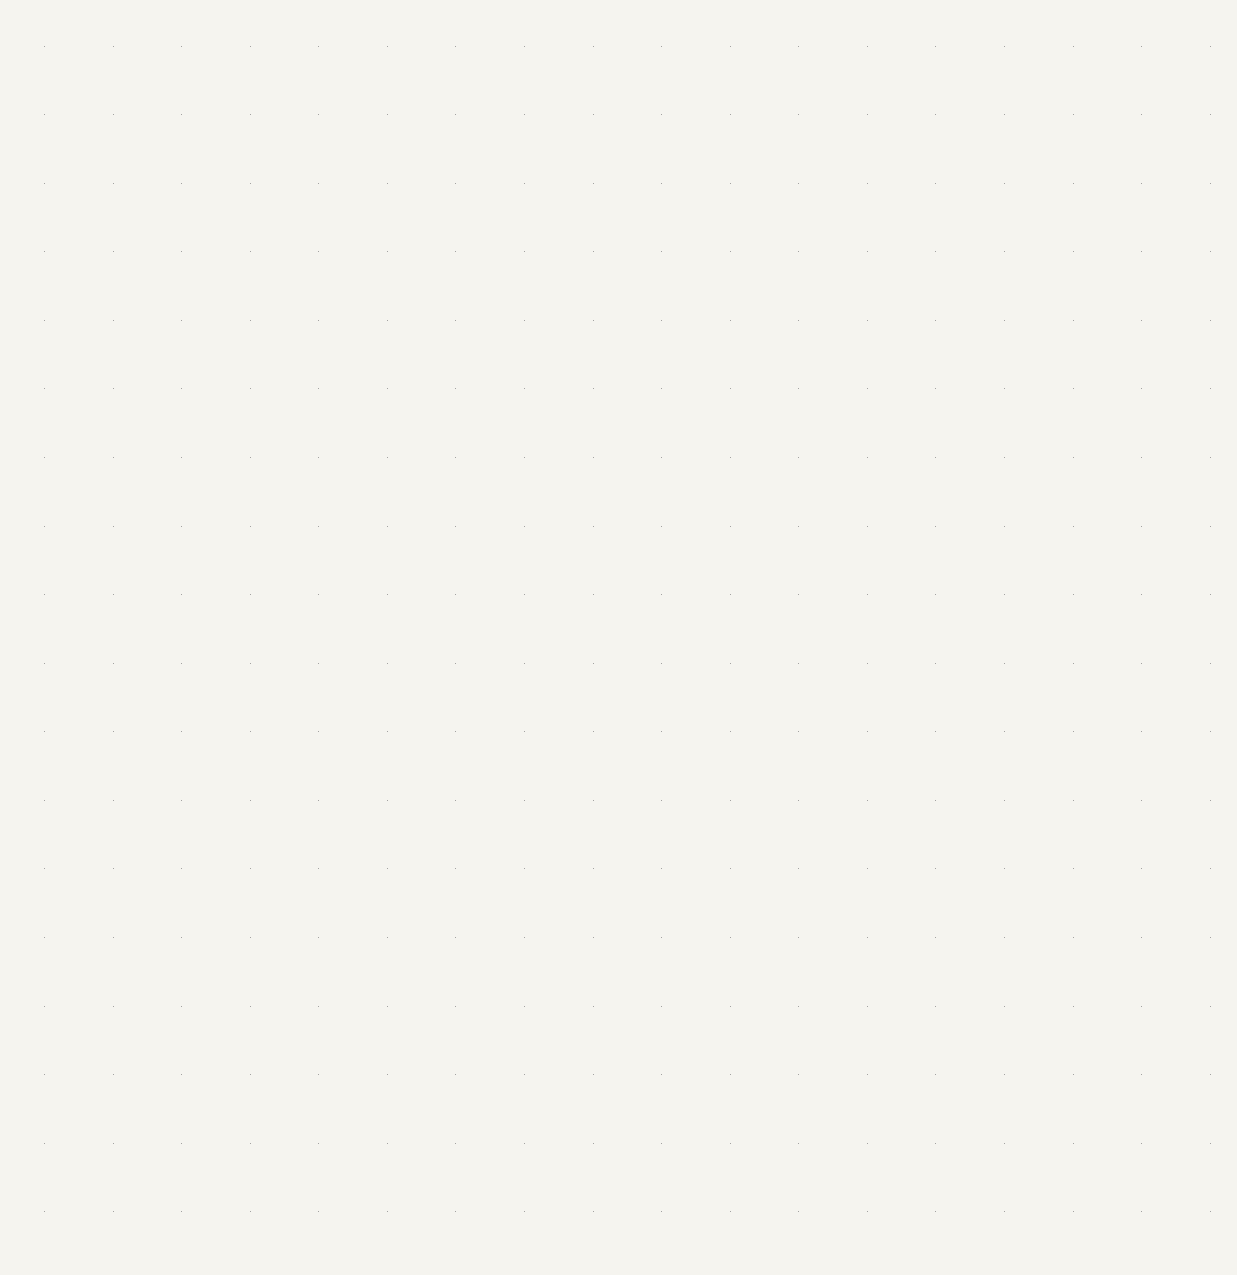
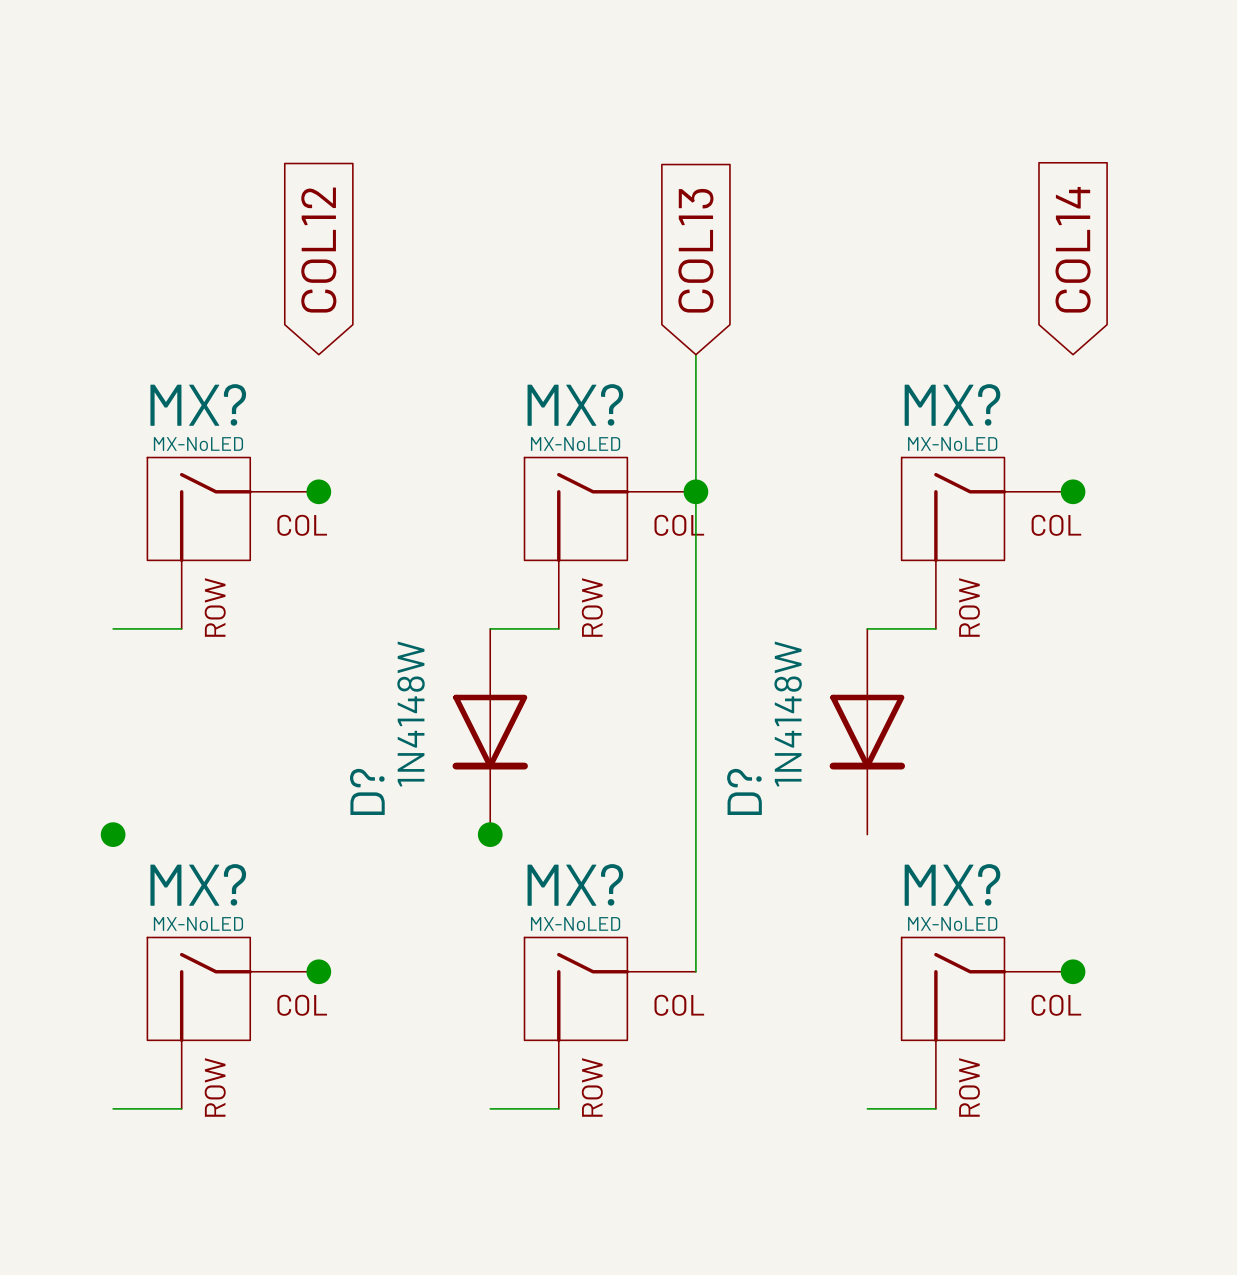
global label: none -> COL14 (1073, 249)
global label: none -> COL12 (318, 250)
global label: none -> COL13 (695, 250)
wire: none -> (695, 354) (695, 971)
junction: none -> (318, 491)
junction: none -> (695, 491)
junction: none -> (1073, 491)
MX?: none -> MX-NoLED (233, 543)
MX?: none -> MX-NoLED (610, 543)
MX?: none -> MX-NoLED (987, 543)
wire: none -> (113, 628) (181, 628)
wire: none -> (490, 628) (558, 628)
wire: none -> (867, 628) (935, 628)
D?: none -> 1N4148W (490, 731)
D?: none -> 1N4148W (867, 731)
junction: none -> (113, 834)
junction: none -> (490, 834)
junction: none -> (318, 971)
junction: none -> (1073, 971)
MX?: none -> MX-NoLED (233, 1023)
MX?: none -> MX-NoLED (610, 1023)
MX?: none -> MX-NoLED (987, 1023)
wire: none -> (113, 1108) (181, 1108)
wire: none -> (490, 1108) (558, 1108)
wire: none -> (867, 1108) (935, 1108)

